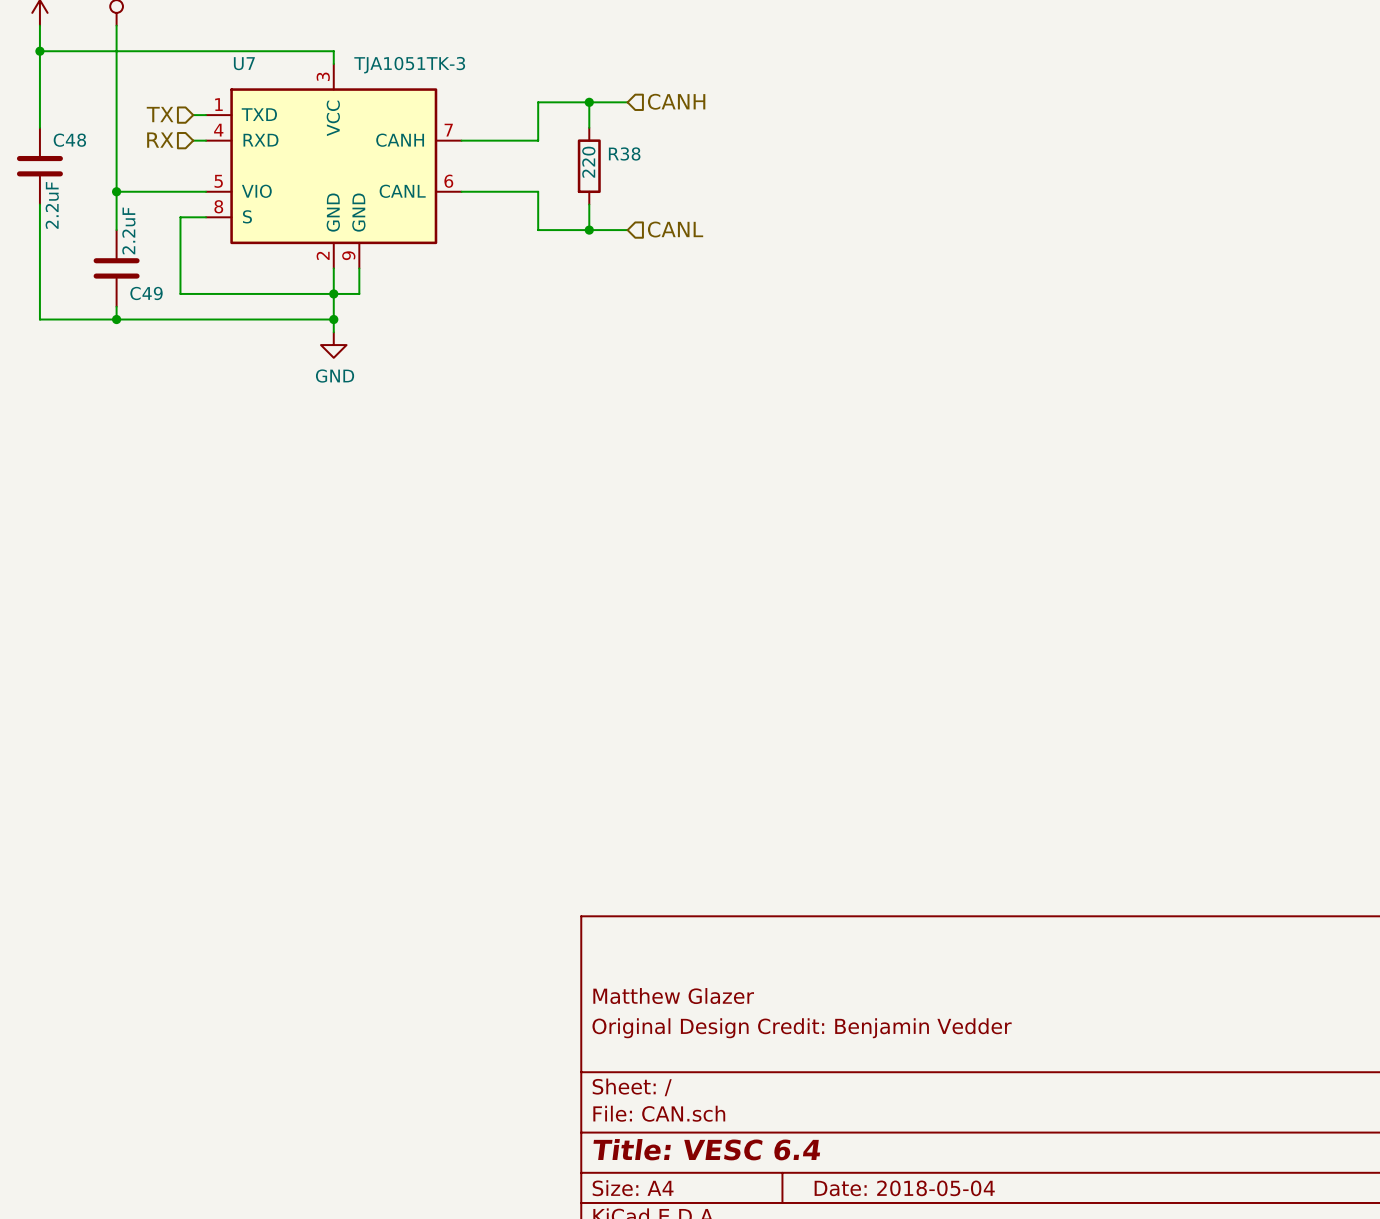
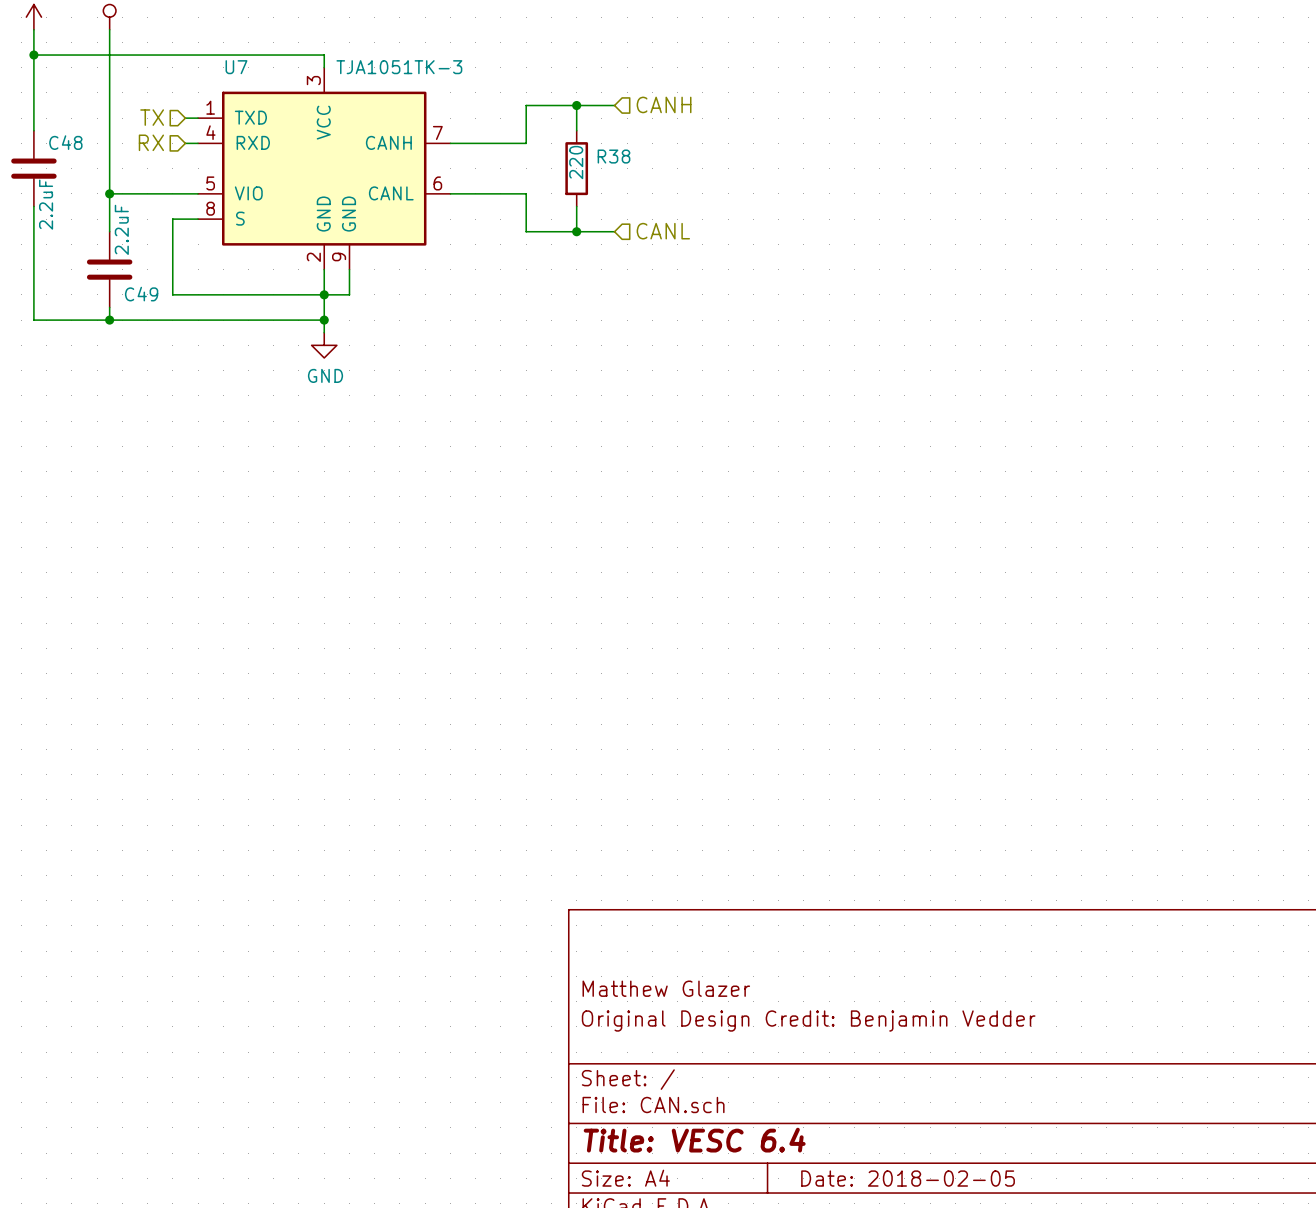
title block: Date: 2018-05-04 (904, 1188) -> Date: 2018-02-05 (908, 1178)

